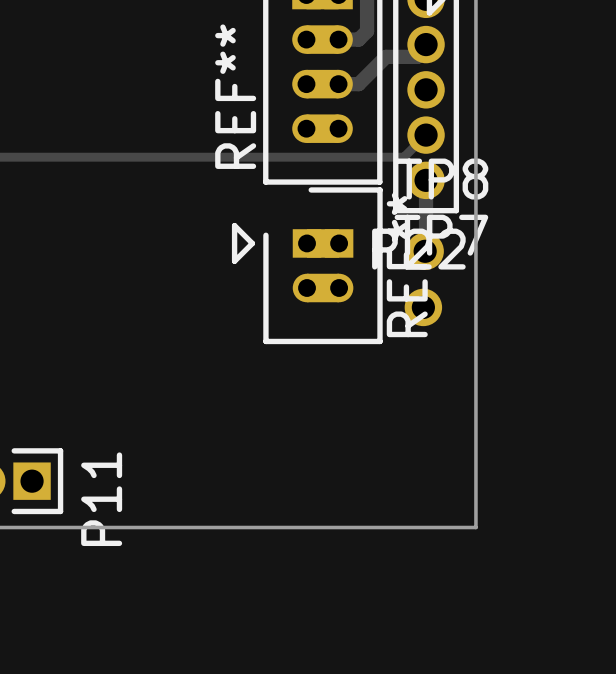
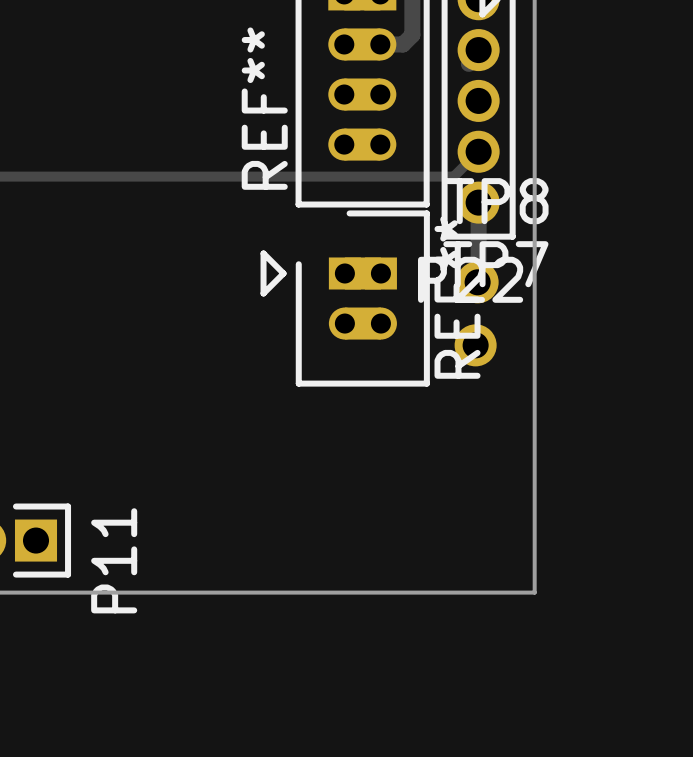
track: (417, 56) (385, 56) (358, 84) (338, 84) -> none

